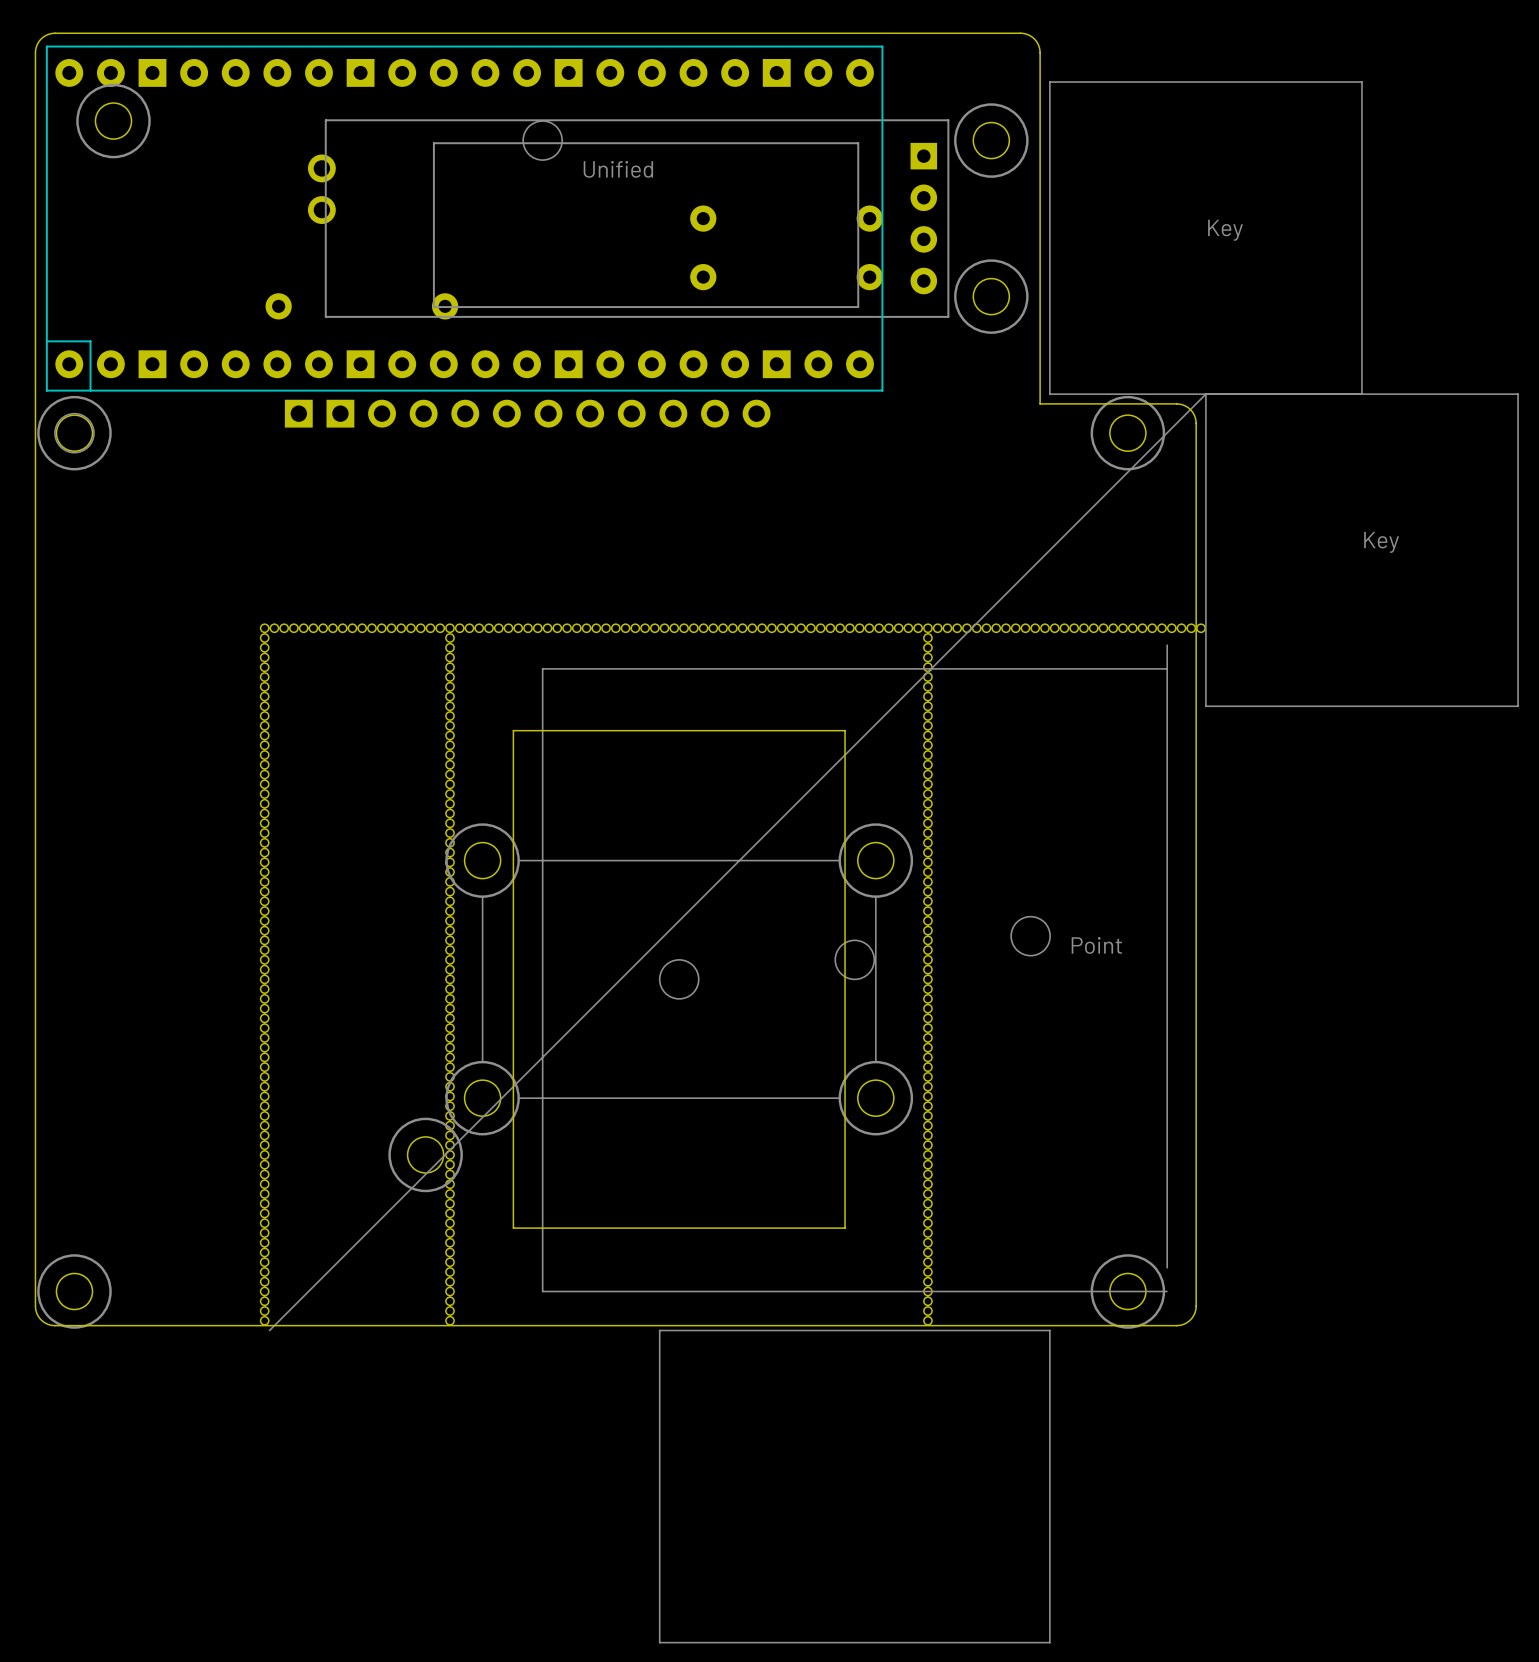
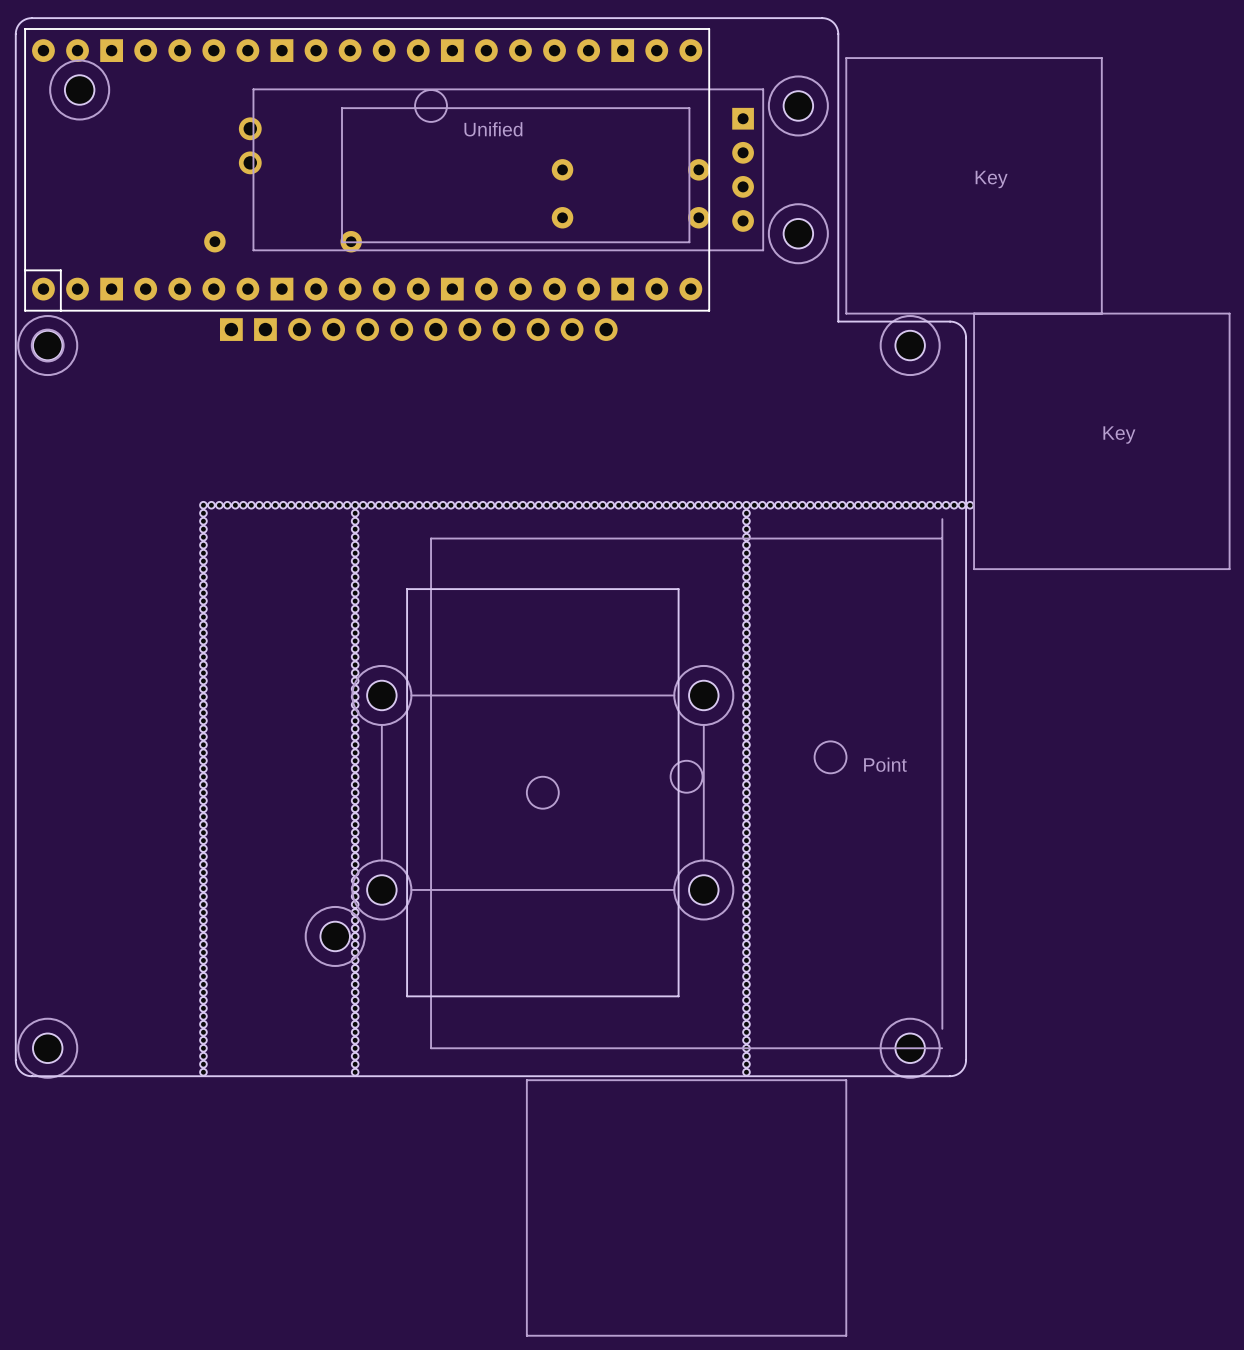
line: (1205, 394) (269, 1330) -> none

